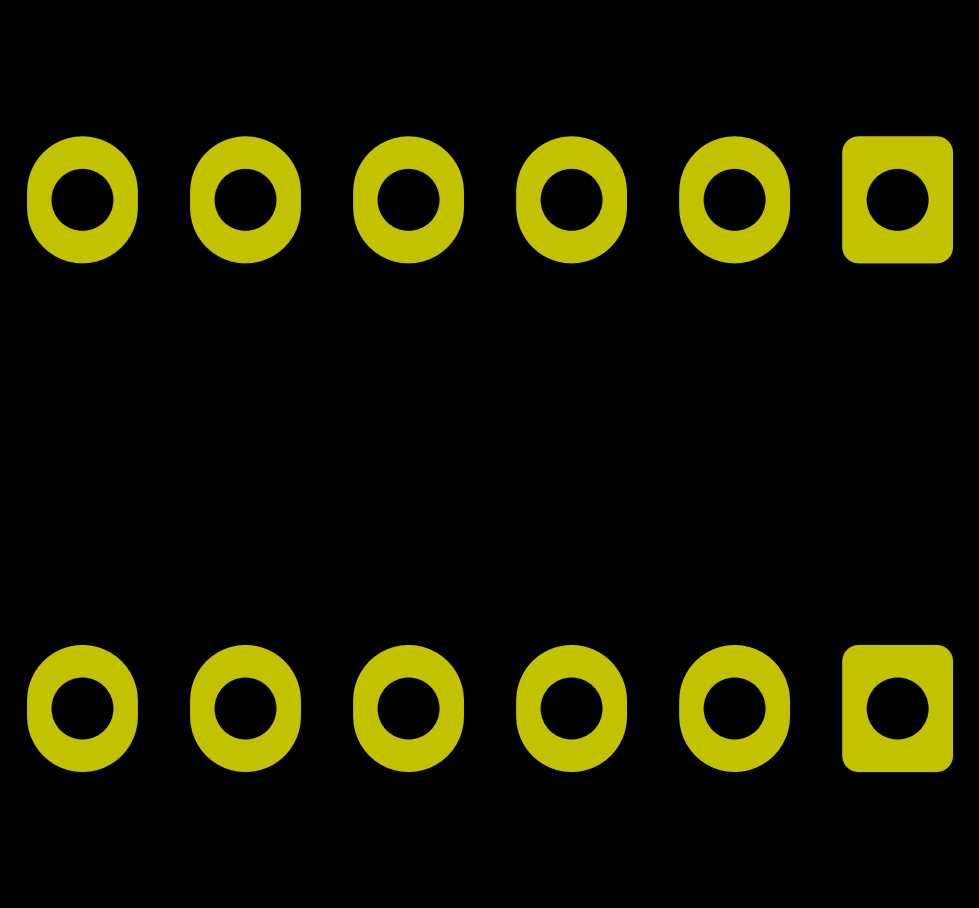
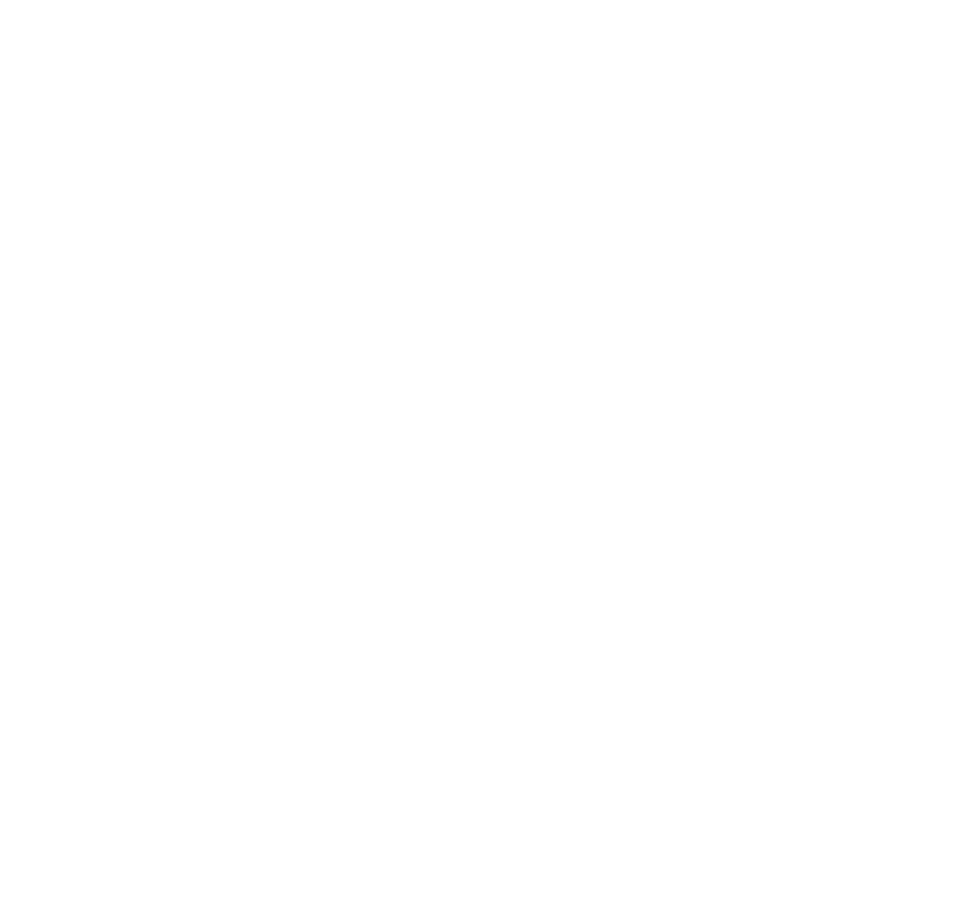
part: (490, 199) -> none
part: (490, 708) -> none

